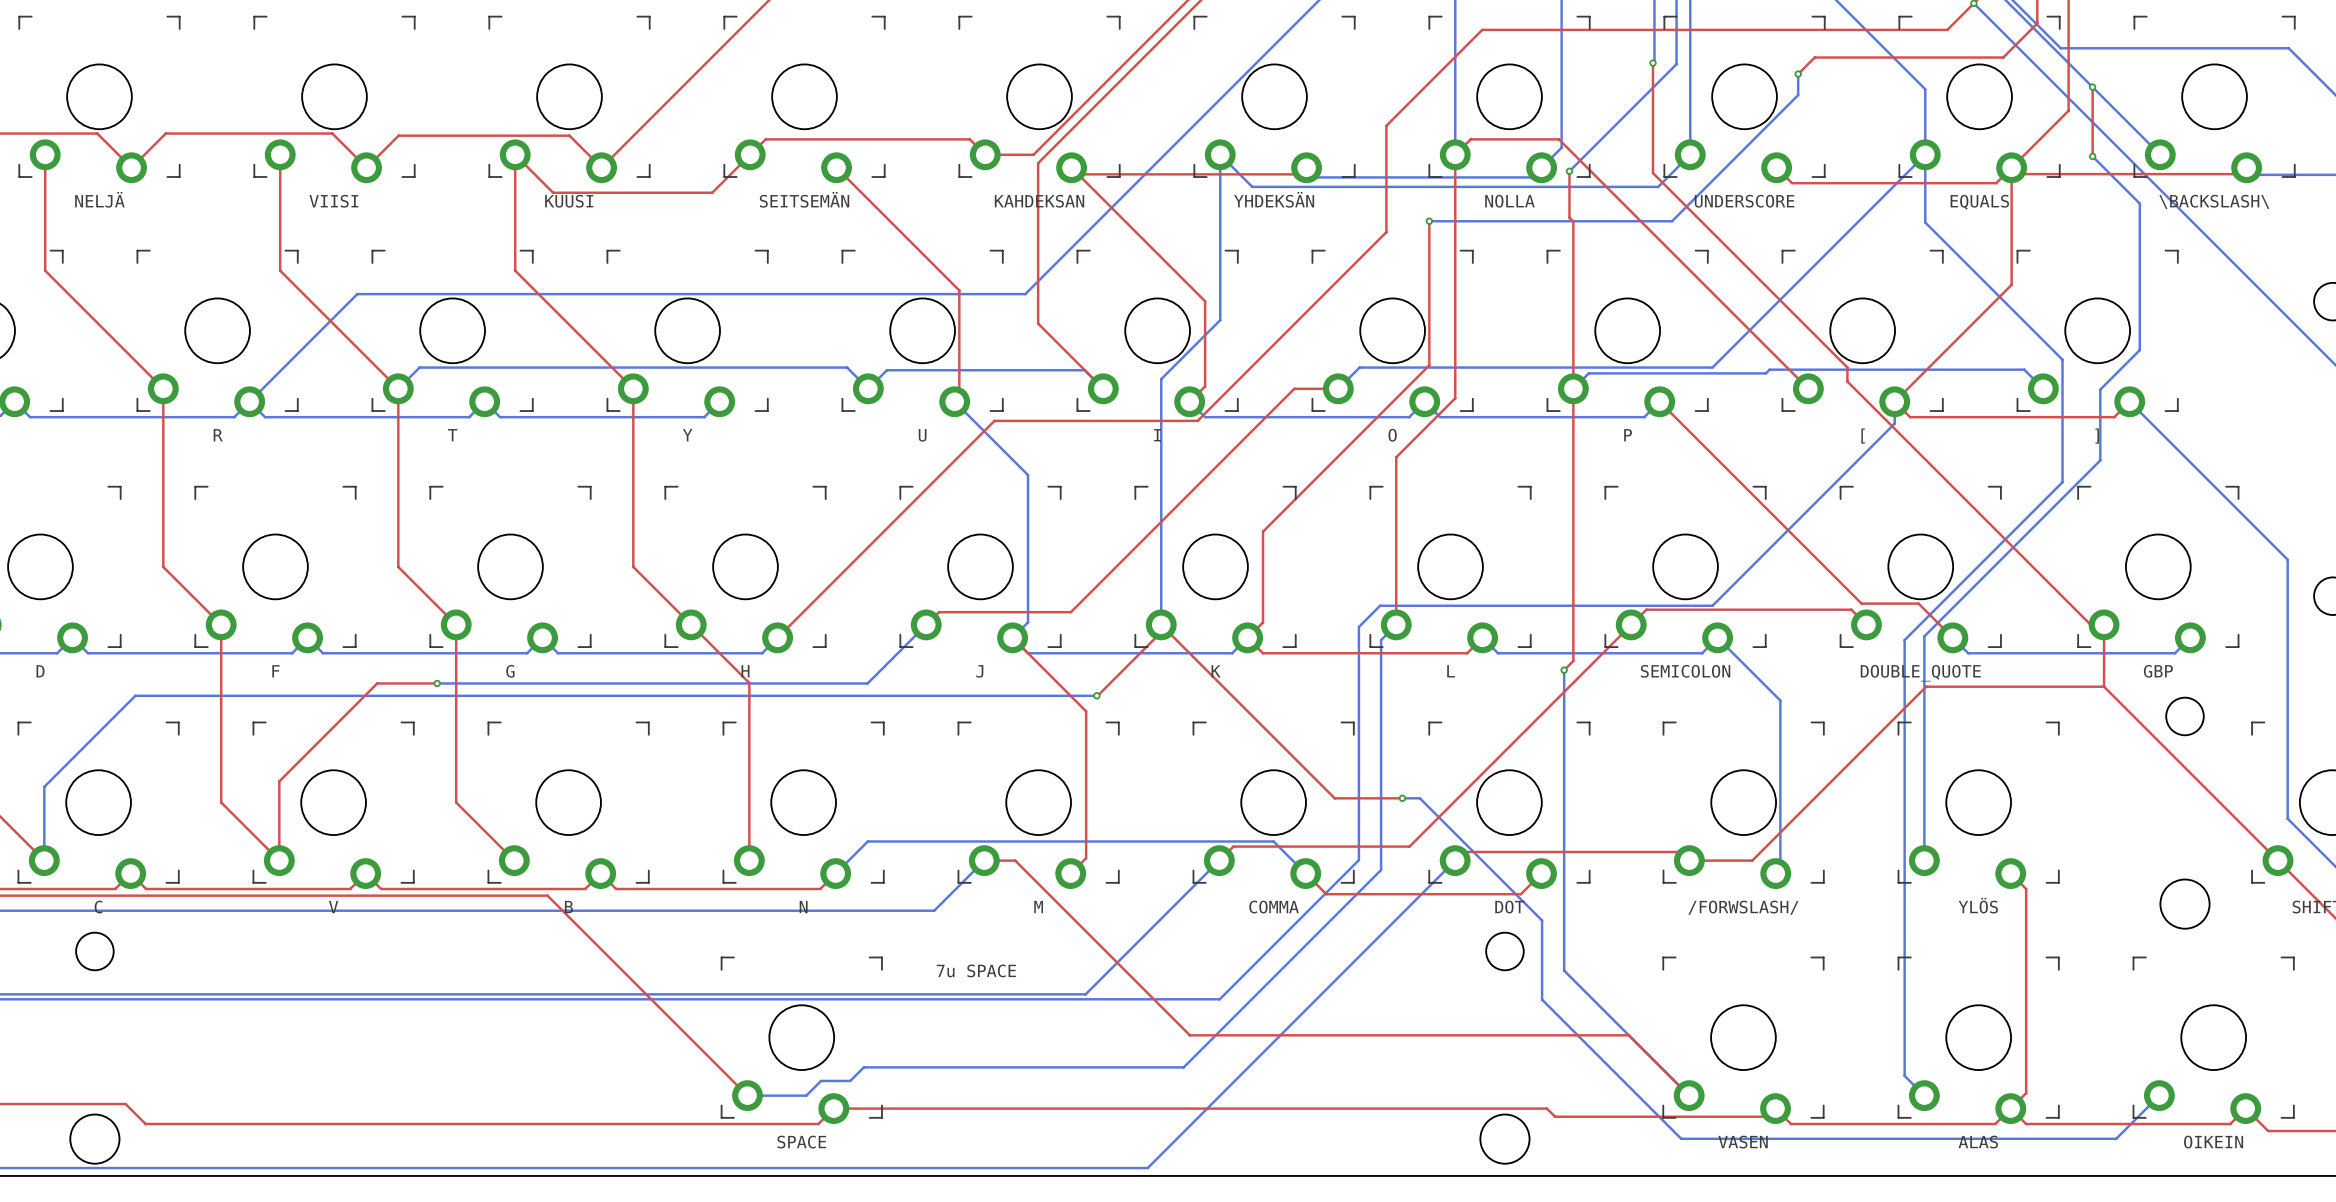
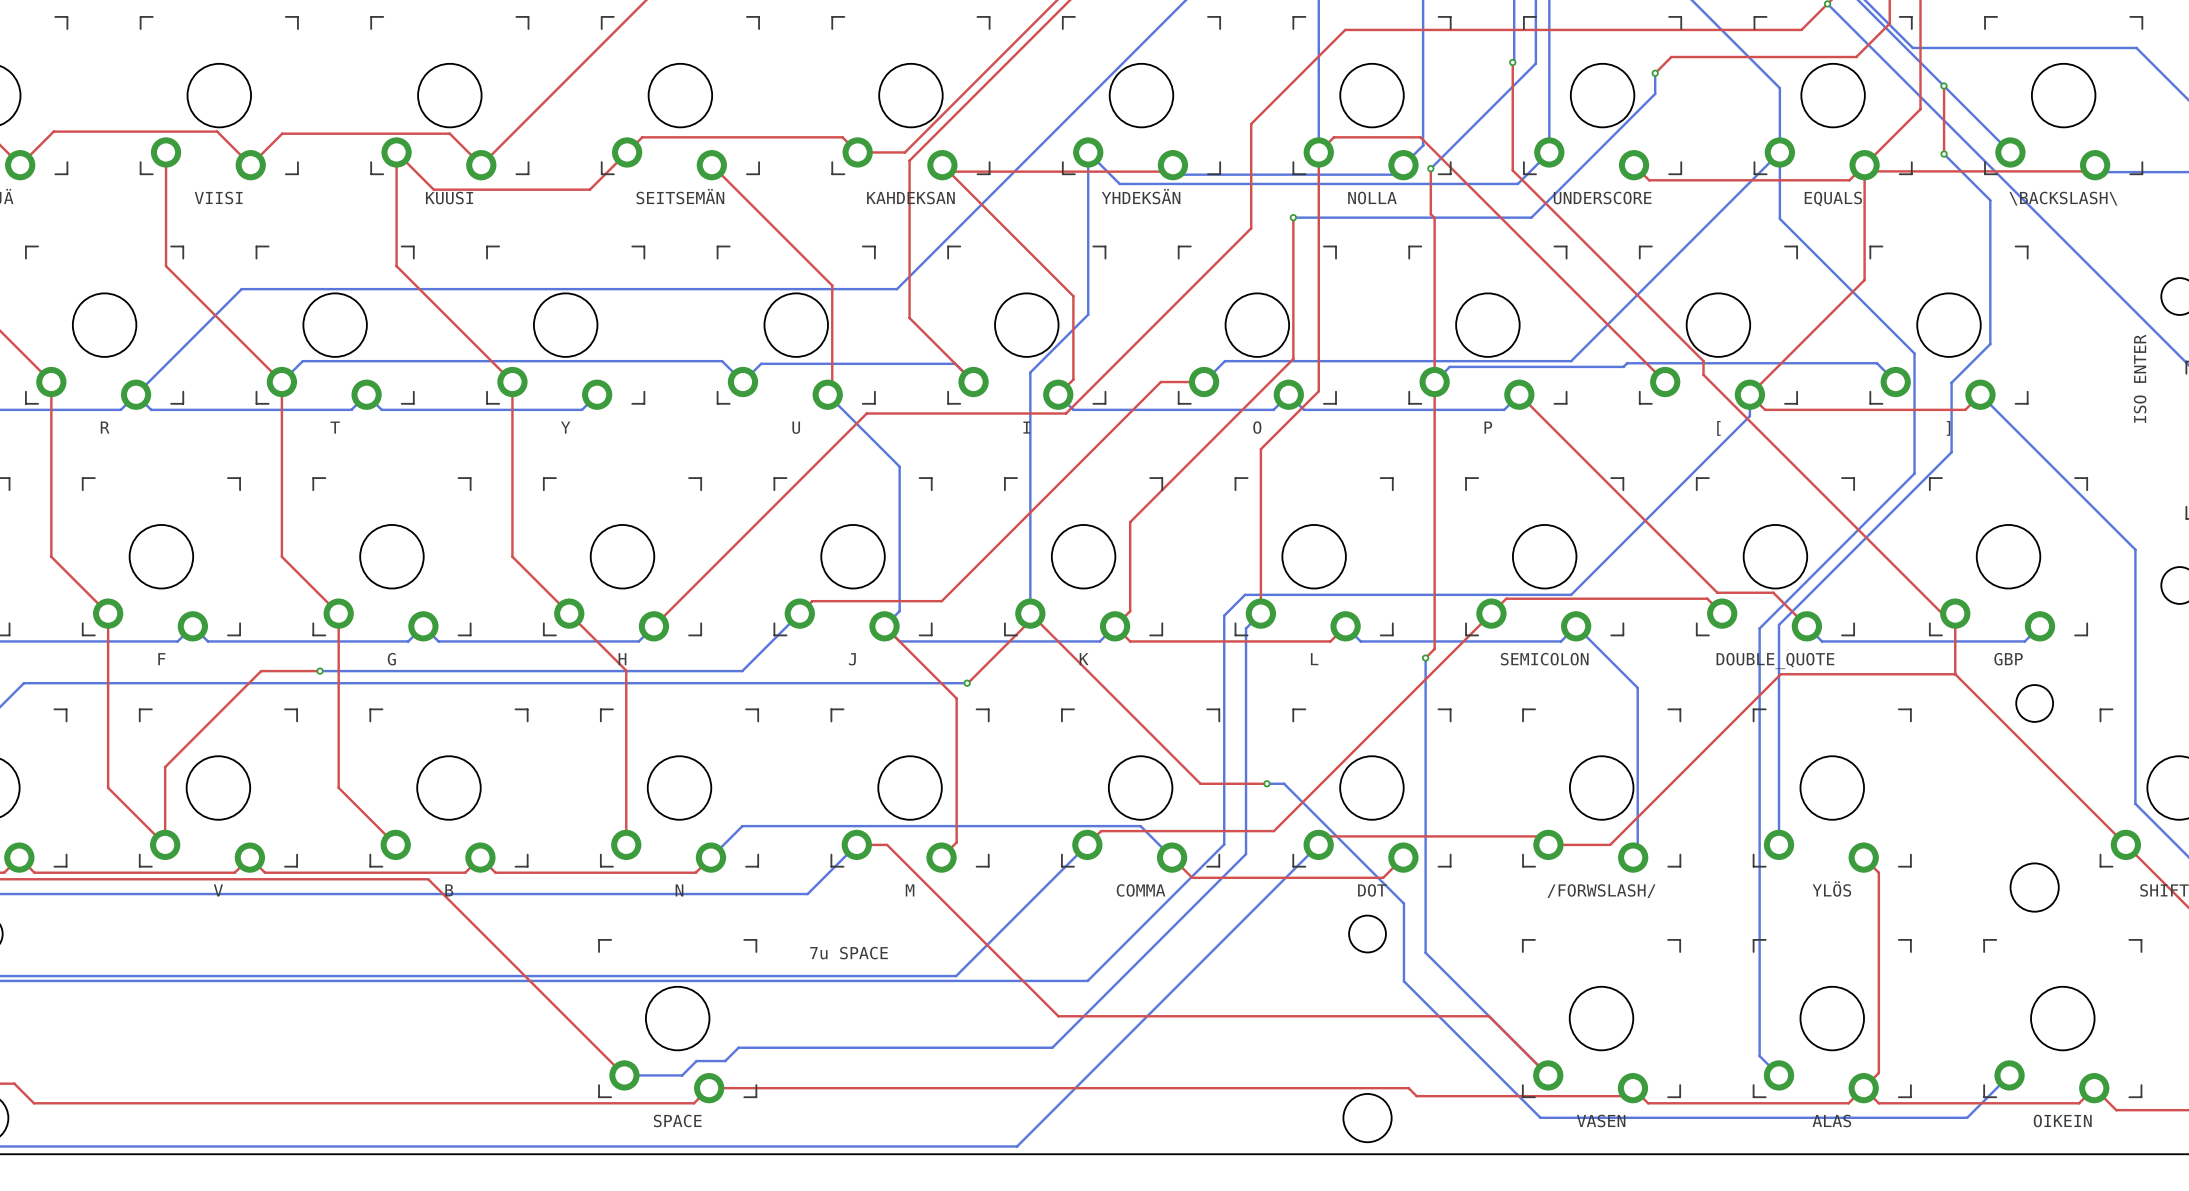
text: none -> ISO ENTER (2140, 378)

